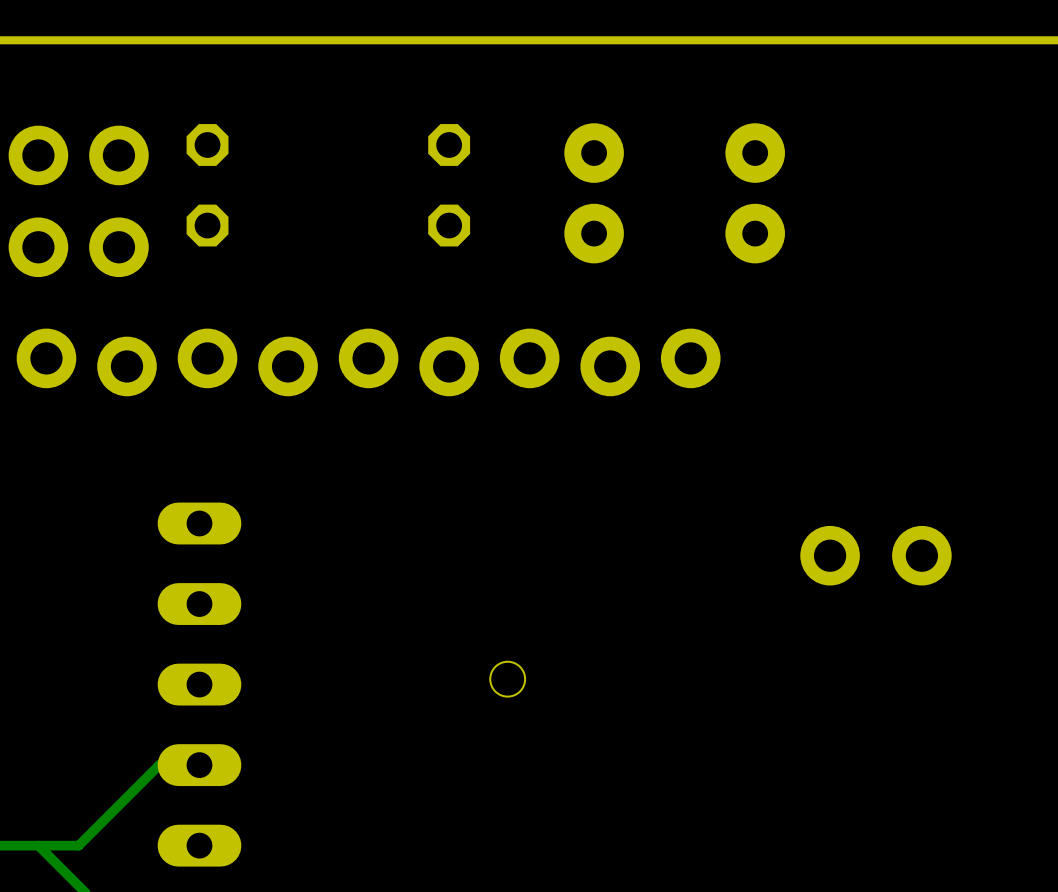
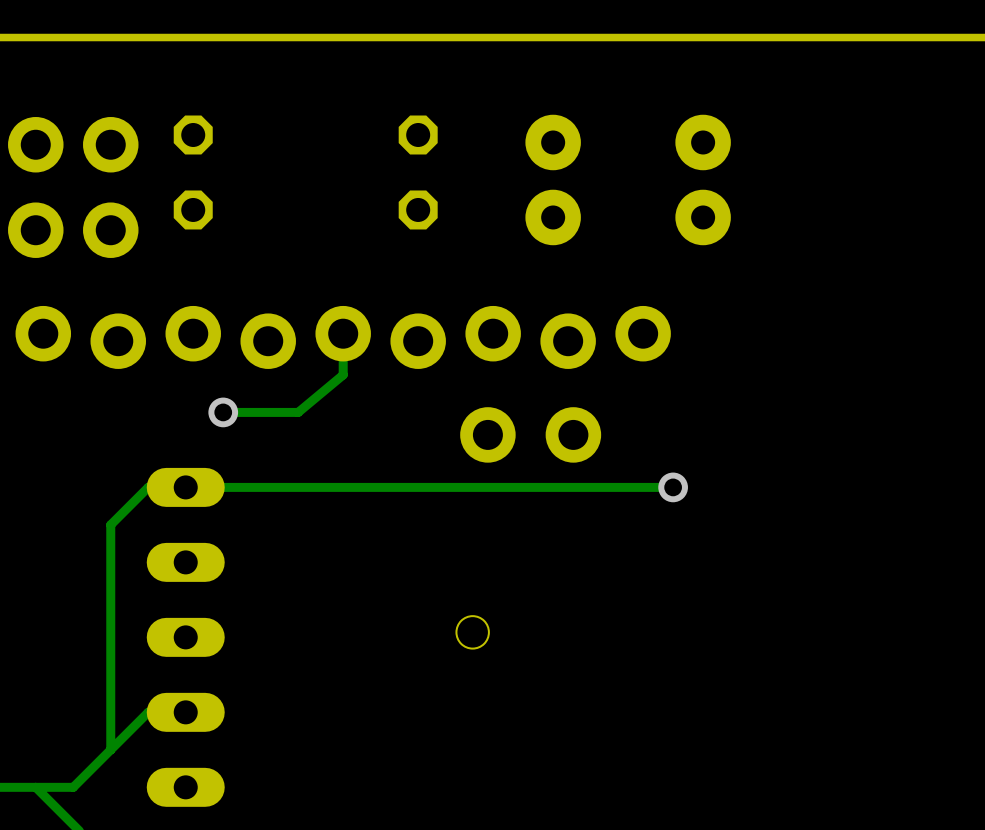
track: none -> (343, 333) (343, 374) (298, 412) (223, 412)
via: none -> (223, 412)
track: none -> (673, 487) (148, 487) (110, 524) (110, 749)
via: none -> (673, 487)
part position: (875, 555) -> (530, 434)

